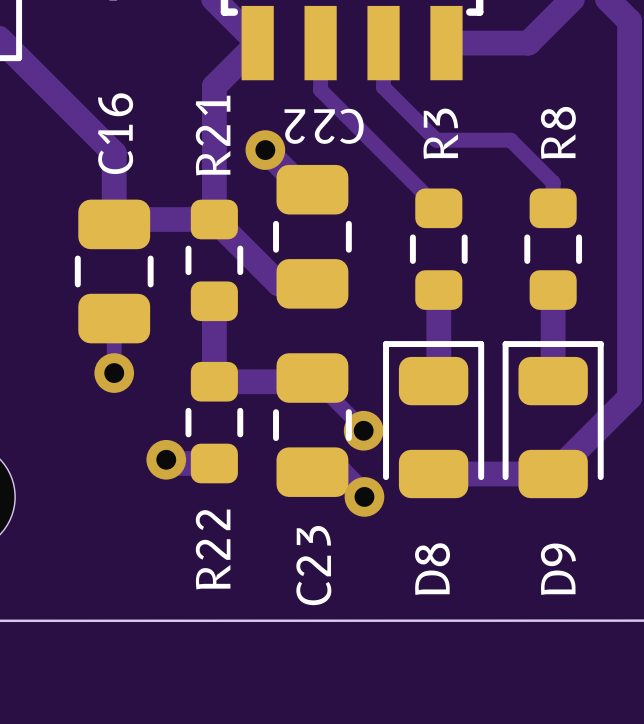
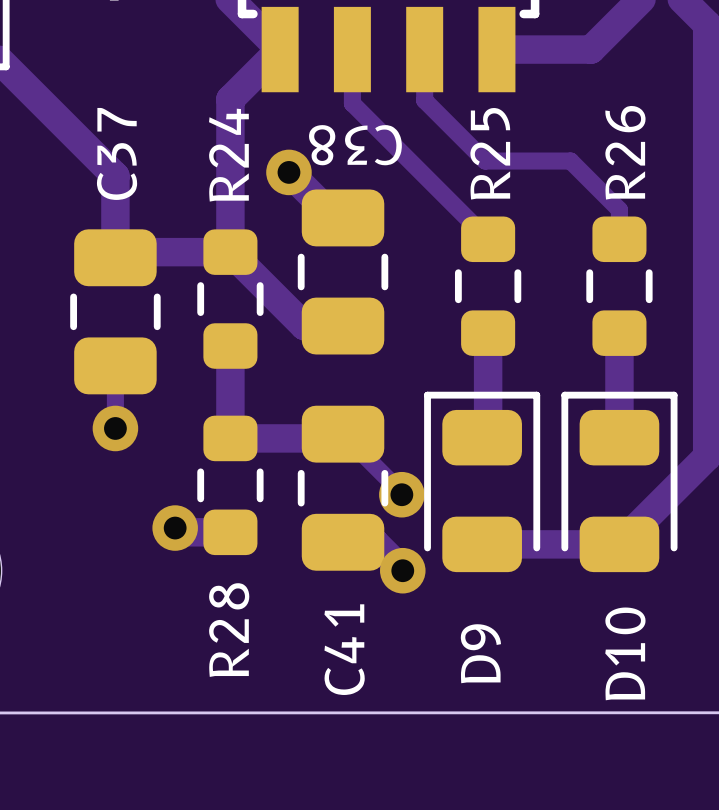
C22 name: C22 (324, 126) -> C38 (355, 145)
R8 name: R8 (558, 132) -> R26 (625, 152)
C16 name: C16 (115, 133) -> C37 (117, 153)
R3 name: R3 (440, 133) -> R25 (490, 153)
R21 name: R21 (213, 135) -> R24 (228, 155)
R22 name: R22 (213, 549) -> R28 (229, 630)
C23 name: C23 (313, 565) -> C41 (344, 649)
D8 name: D8 (432, 569) -> D9 (480, 653)
D9 name: D9 (558, 569) -> D10 (625, 653)

